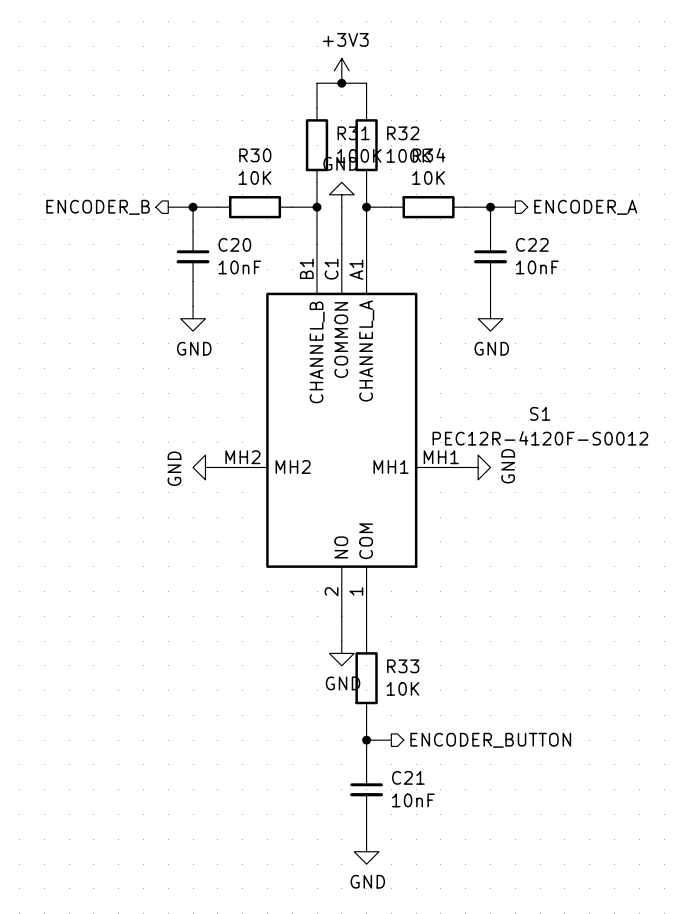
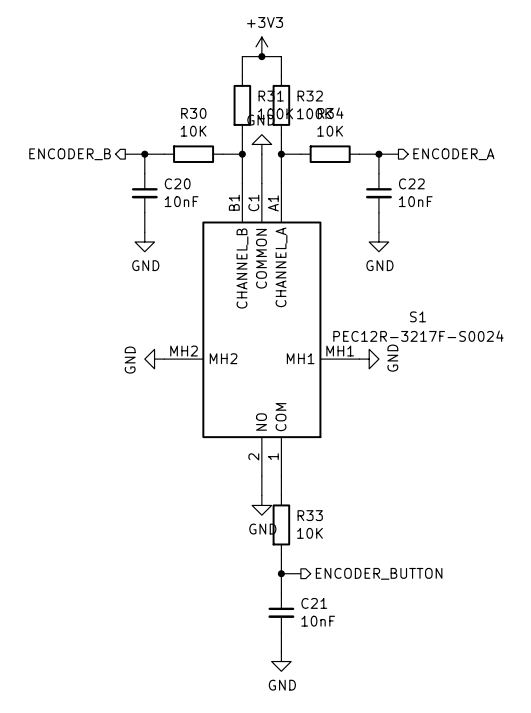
S1 value: PEC12R-4120F-S0012 (540, 438) -> PEC12R-3217F-S0024 (418, 336)

